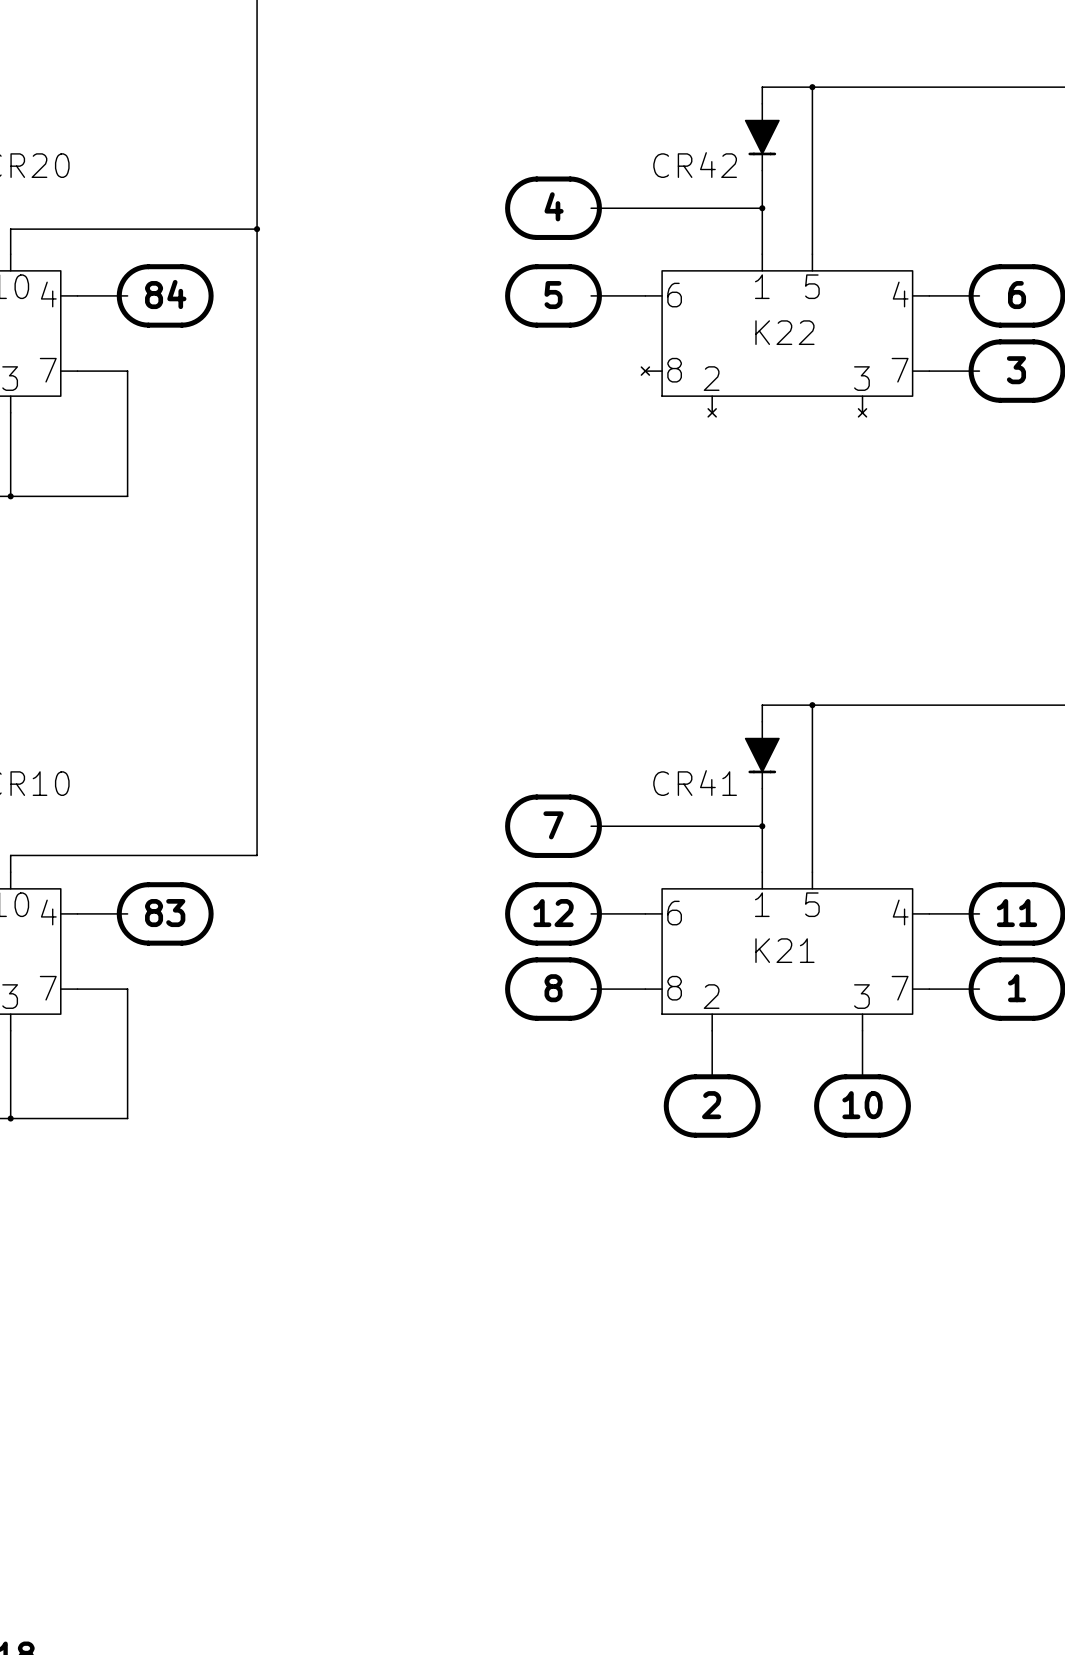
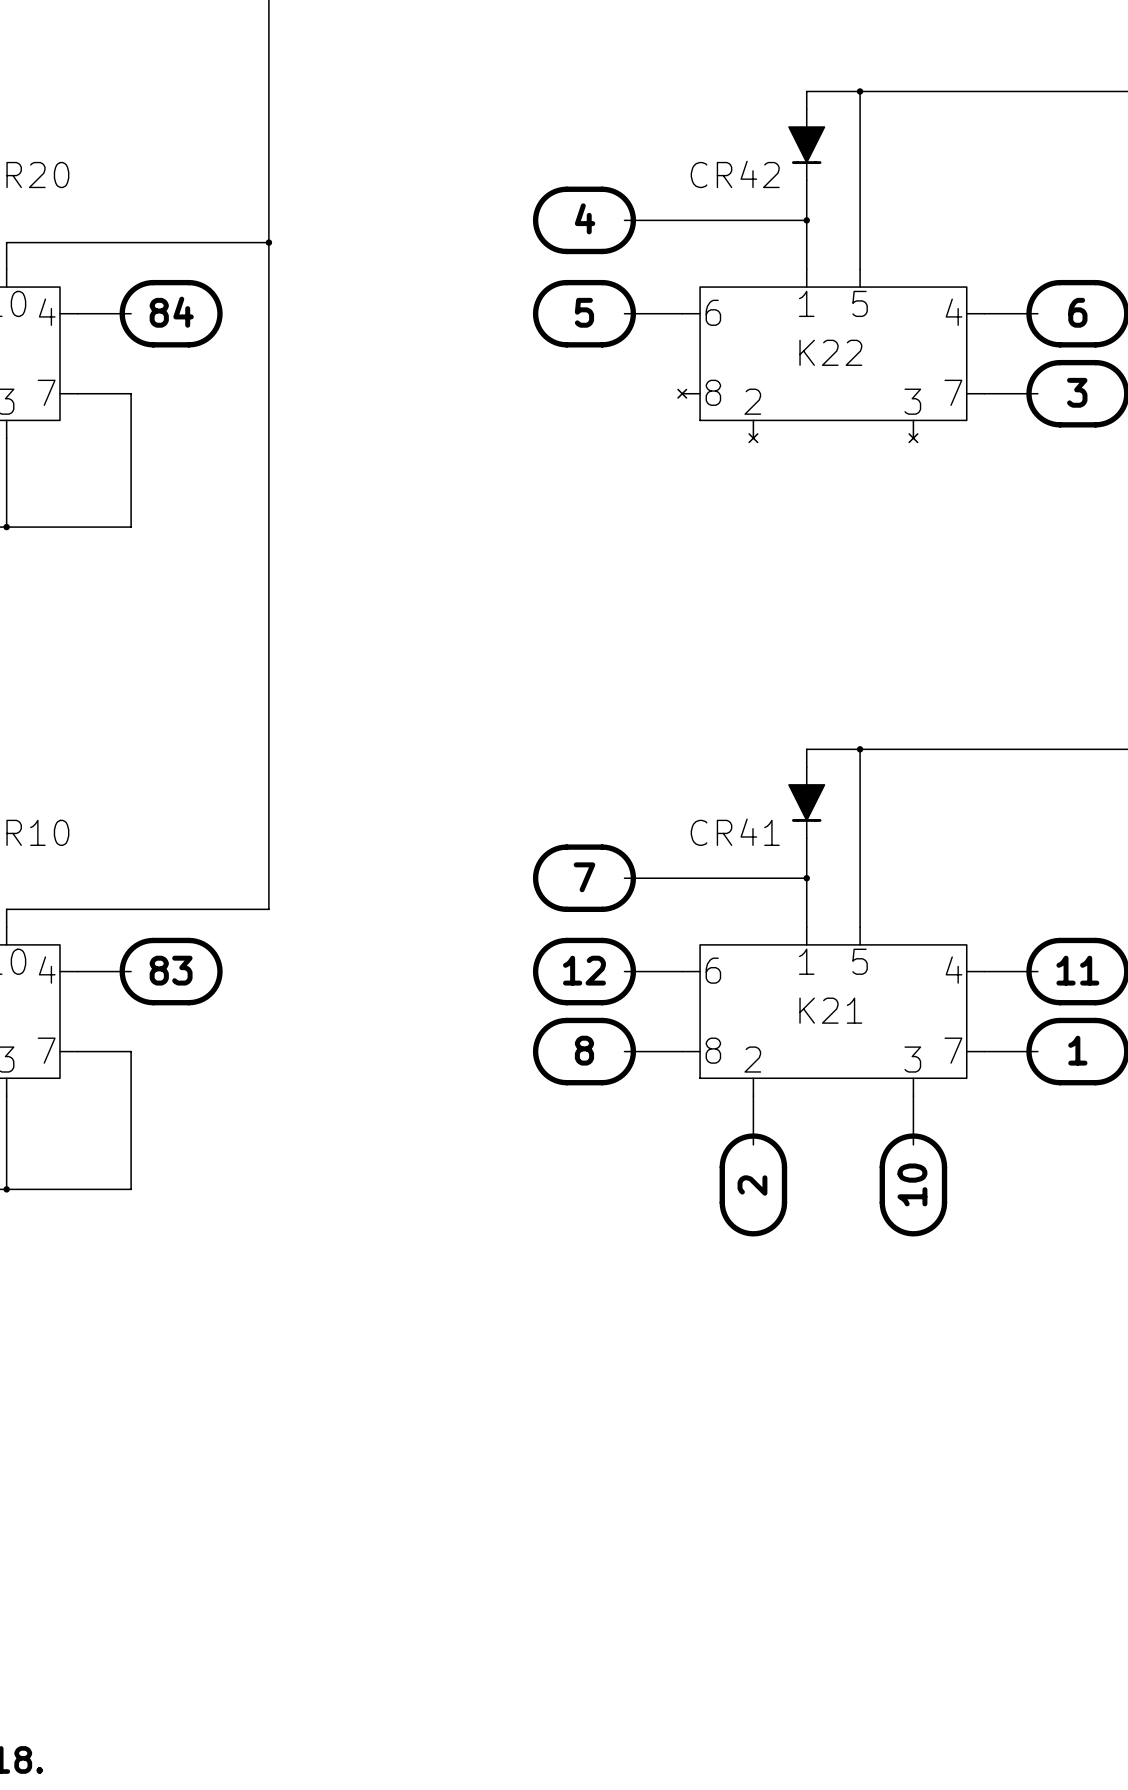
part rotation: 0° (712, 1106) -> 90° clockwise (753, 1184)
part rotation: 0° (862, 1106) -> 90° clockwise (913, 1184)

